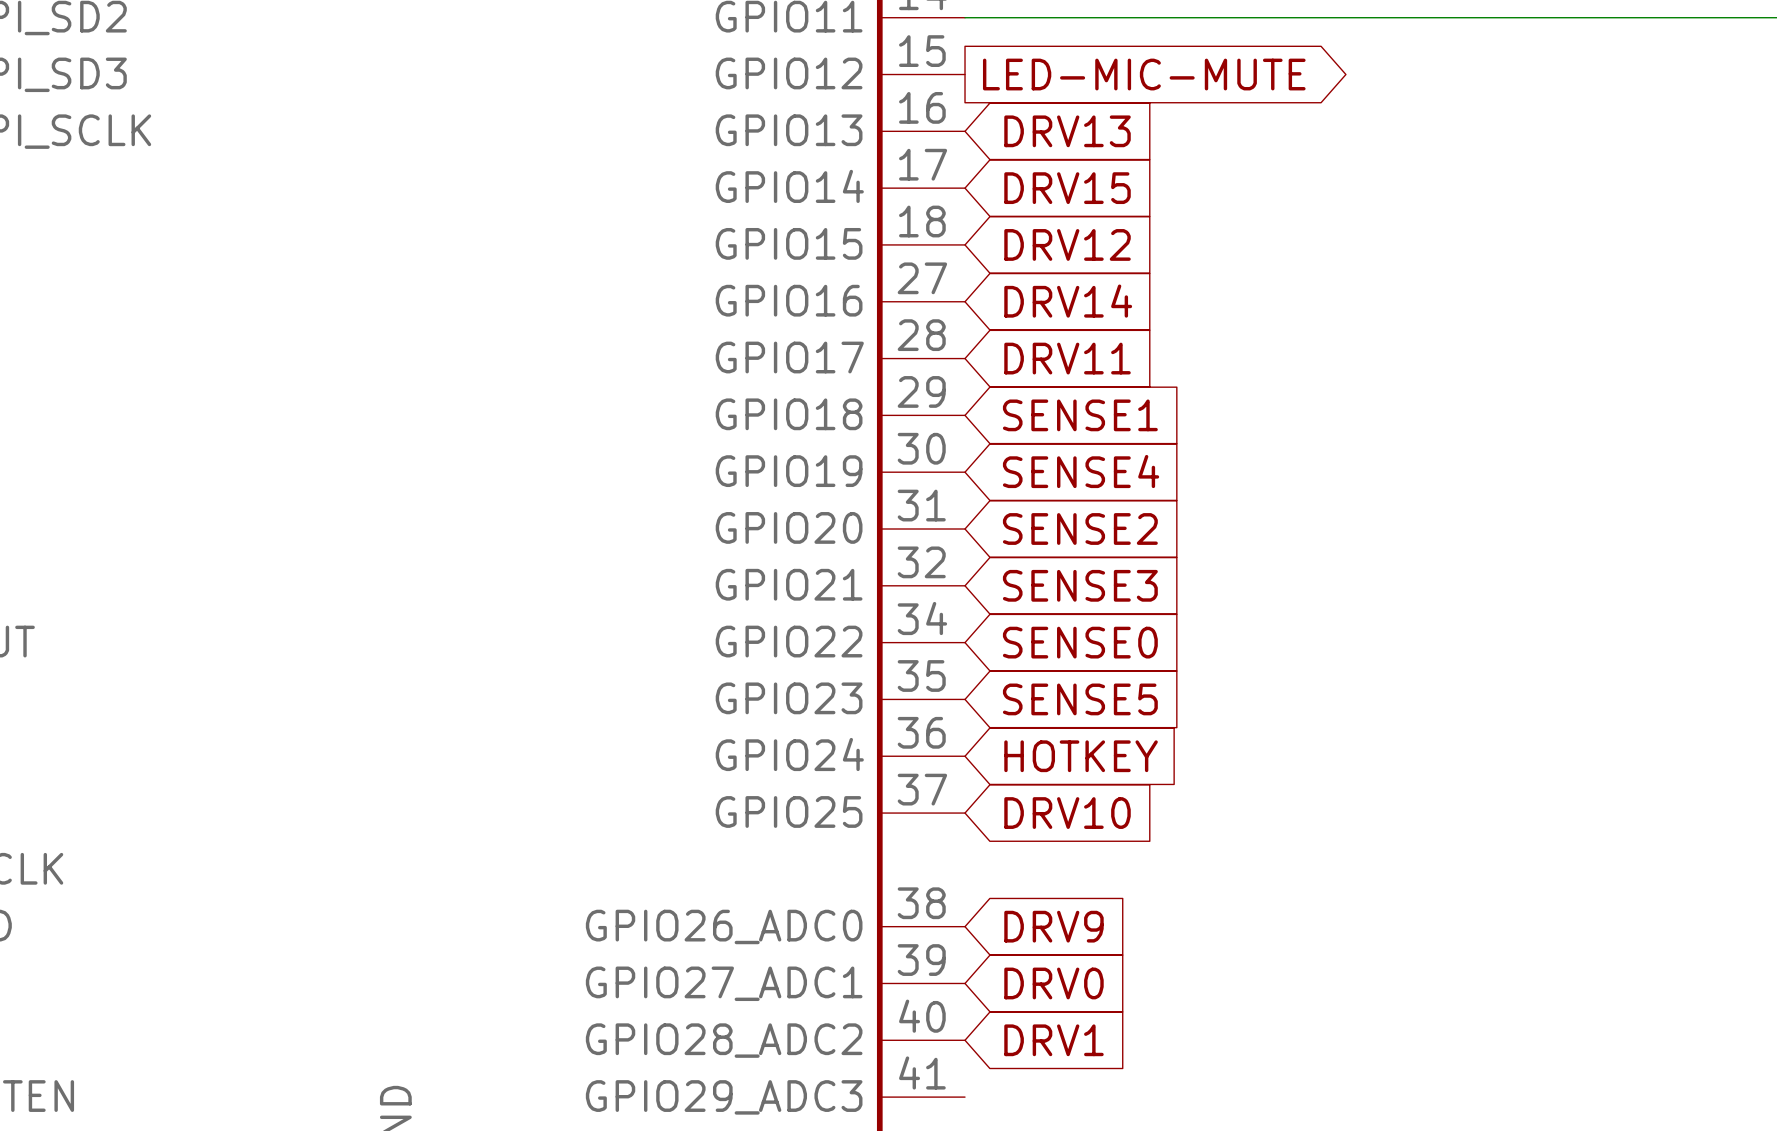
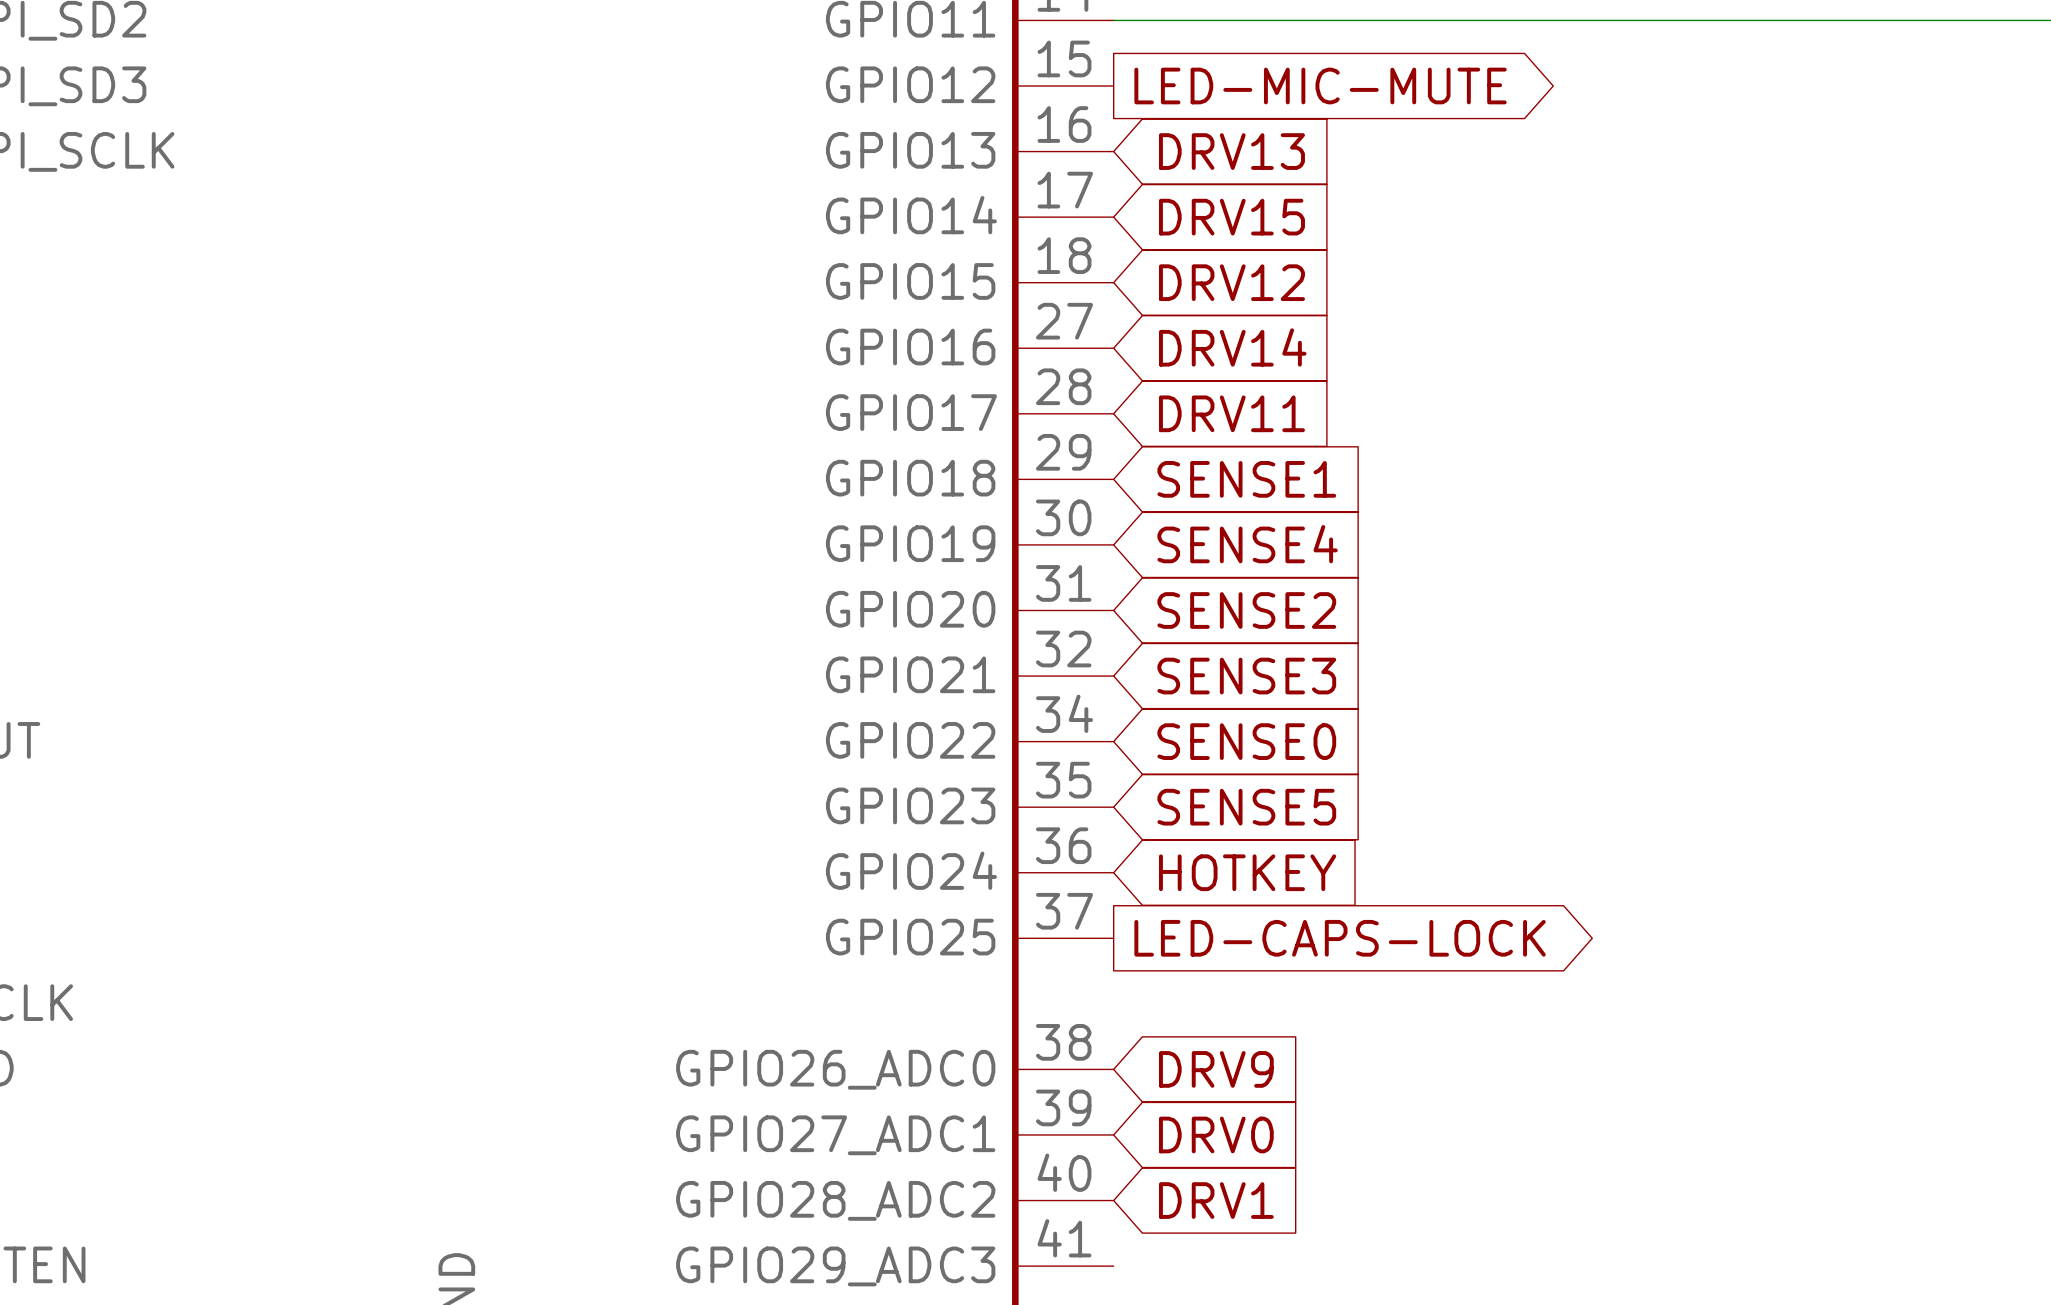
global label shape: input (1067, 813) -> output (1340, 938)
global label: DRV10 (1067, 813) -> LED-CAPS-LOCK (1340, 938)

